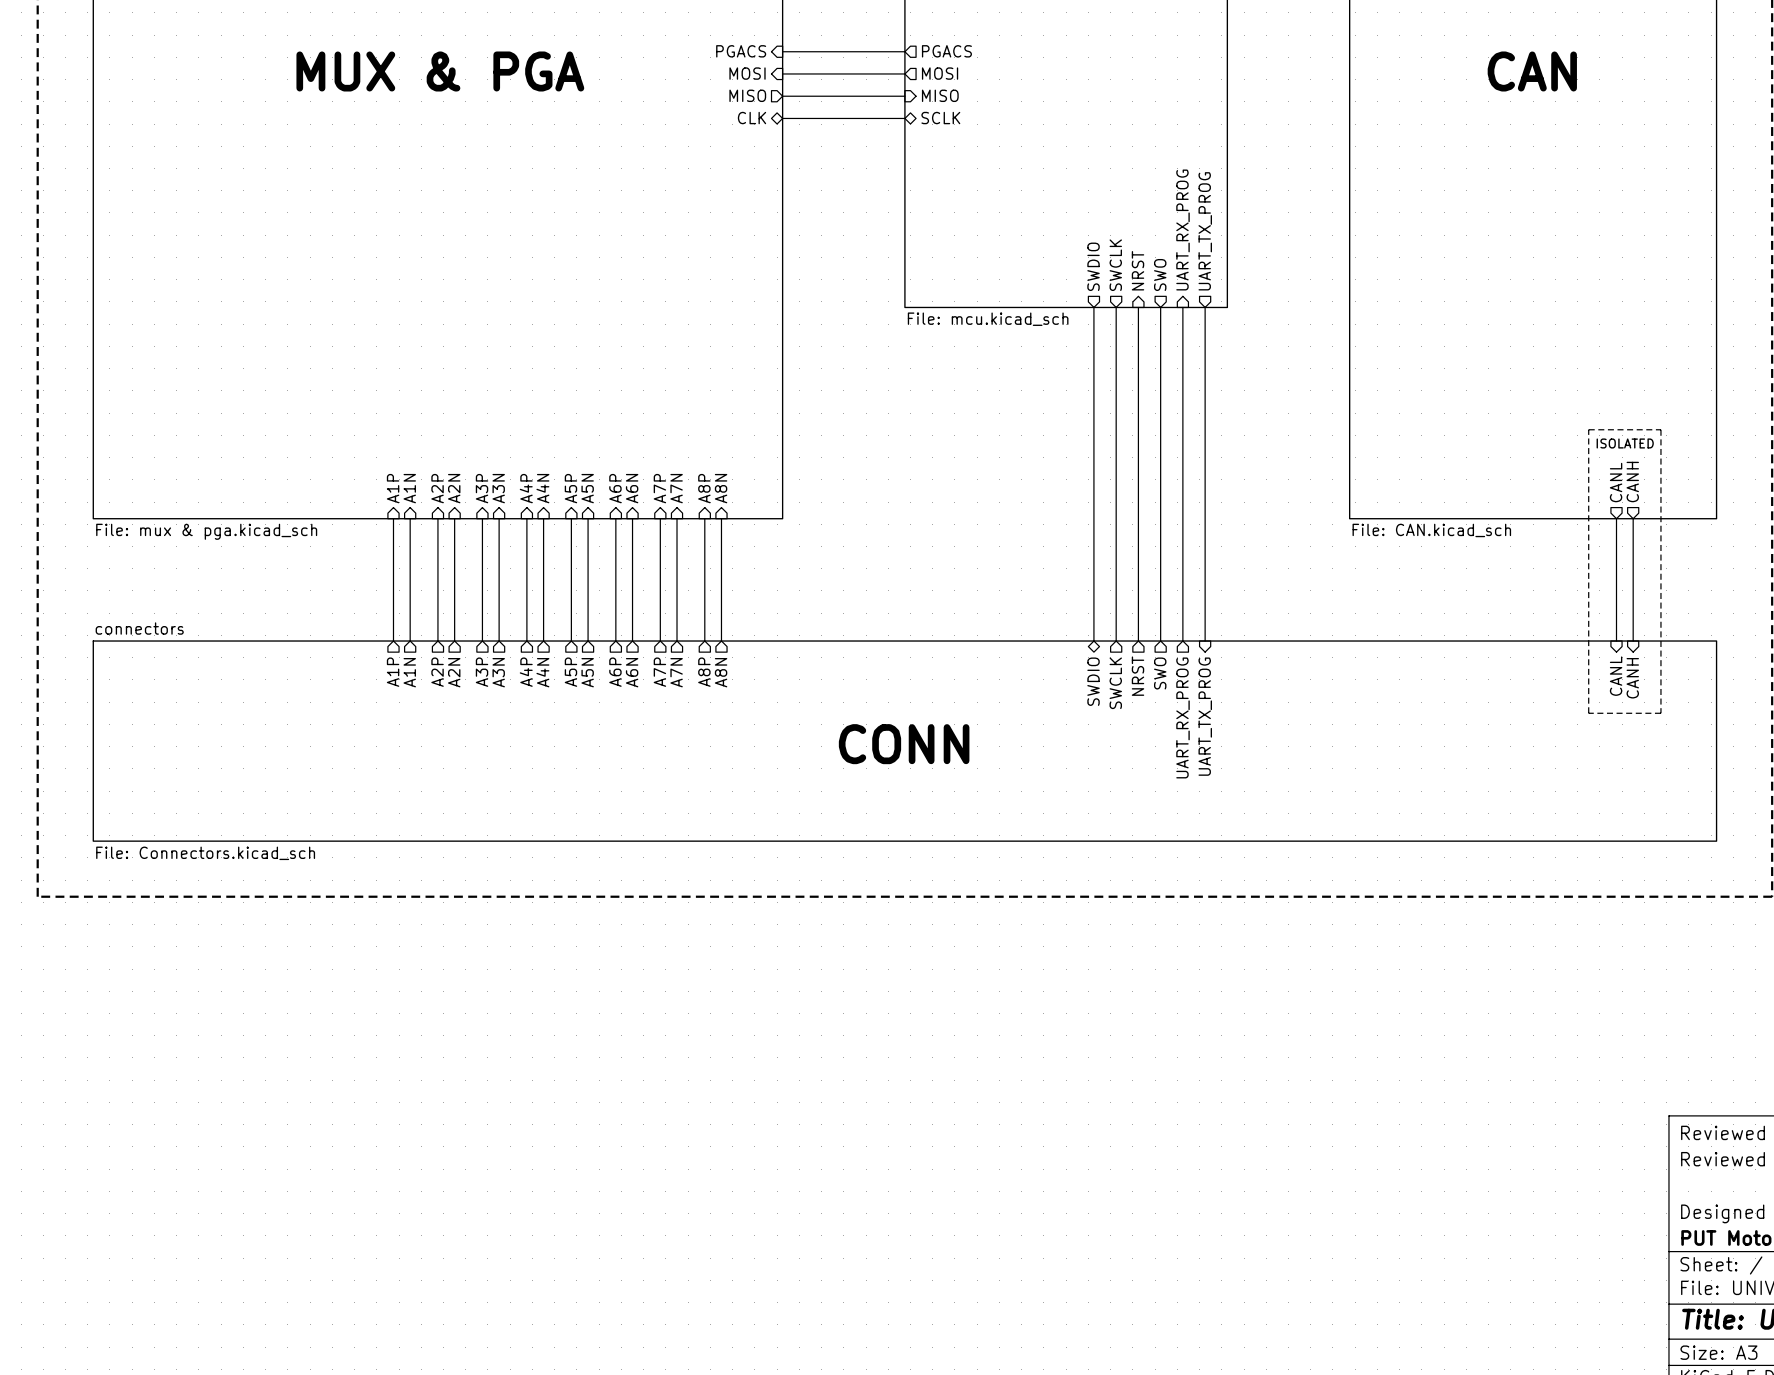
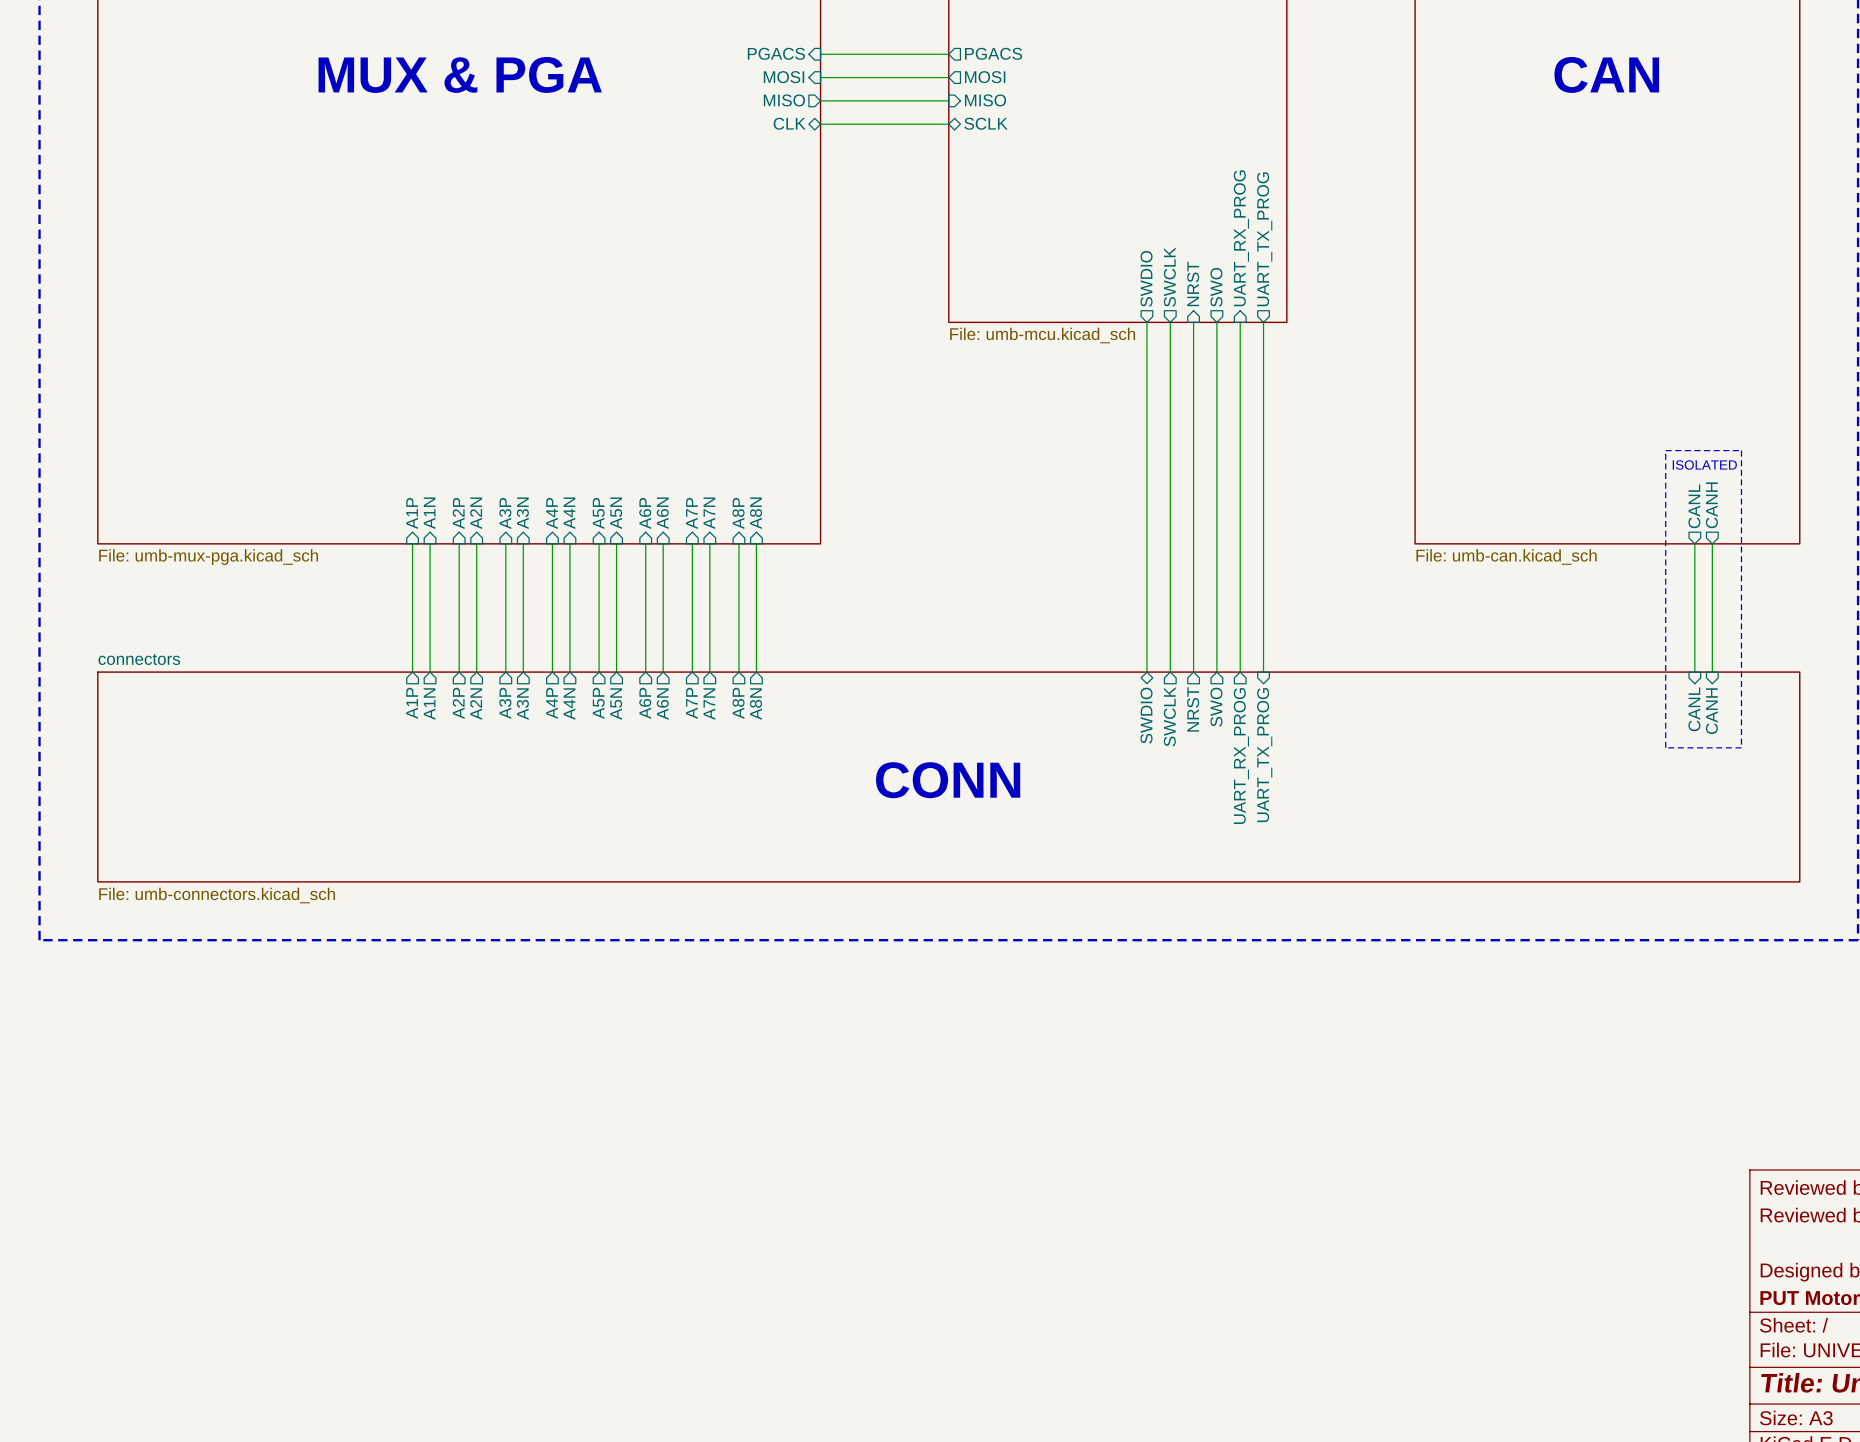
sheet value: File: mcu.kicad_sch (988, 319) -> File: umb-mcu.kicad_sch (1042, 335)
sheet value: File: CAN.kicad_sch (1431, 530) -> File: umb-can.kicad_sch (1506, 556)
sheet value: File: mux & pga.kicad_sch (206, 531) -> File: umb-mux-pga.kicad_sch (208, 557)
sheet connectors value: File: Connectors.kicad_sch (205, 853) -> File: umb-connectors.kicad_sch (217, 895)

